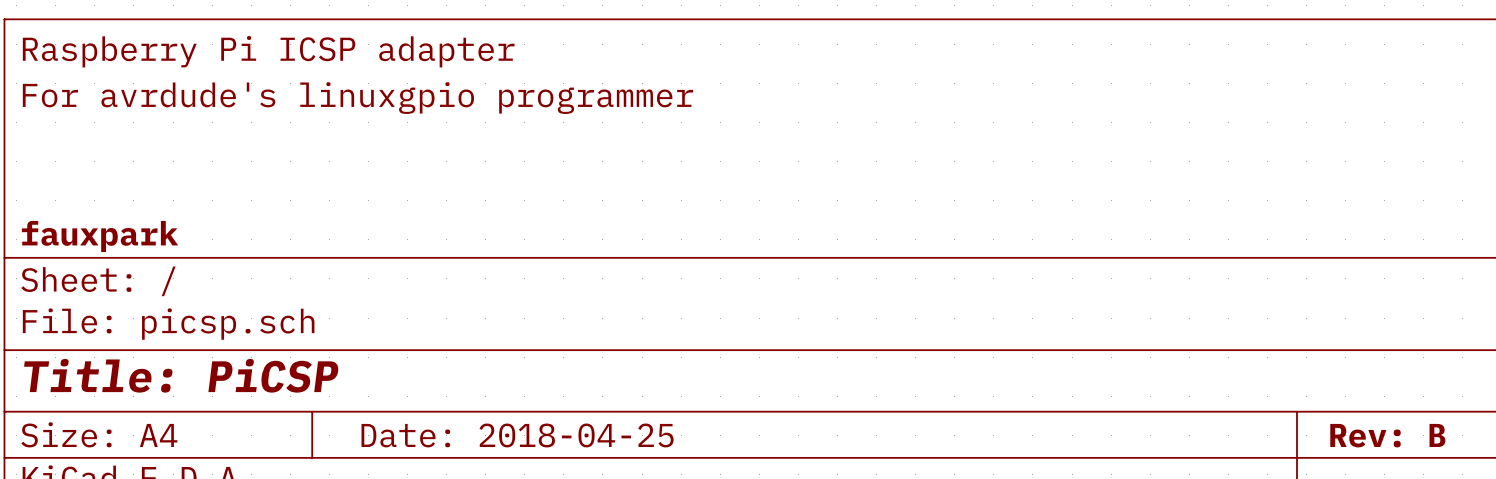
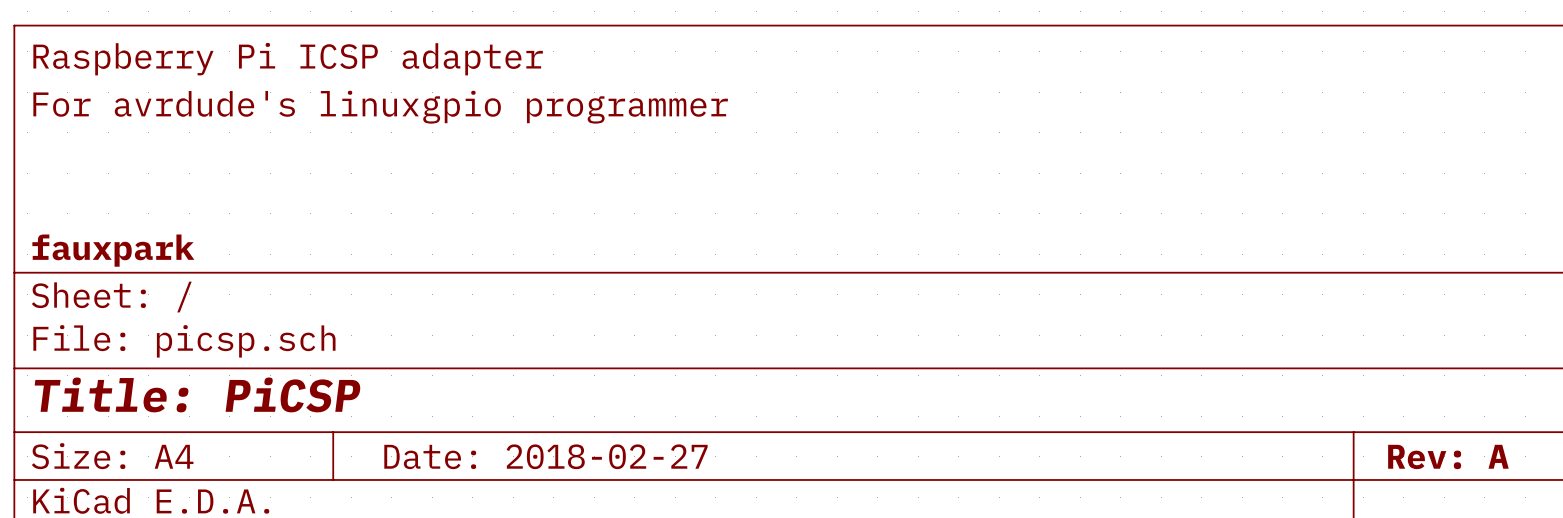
title block: Date: 2018-04-25 (517, 435) -> Date: 2018-02-27 (545, 456)
title block: Rev: B (1387, 435) -> Rev: A (1448, 456)

